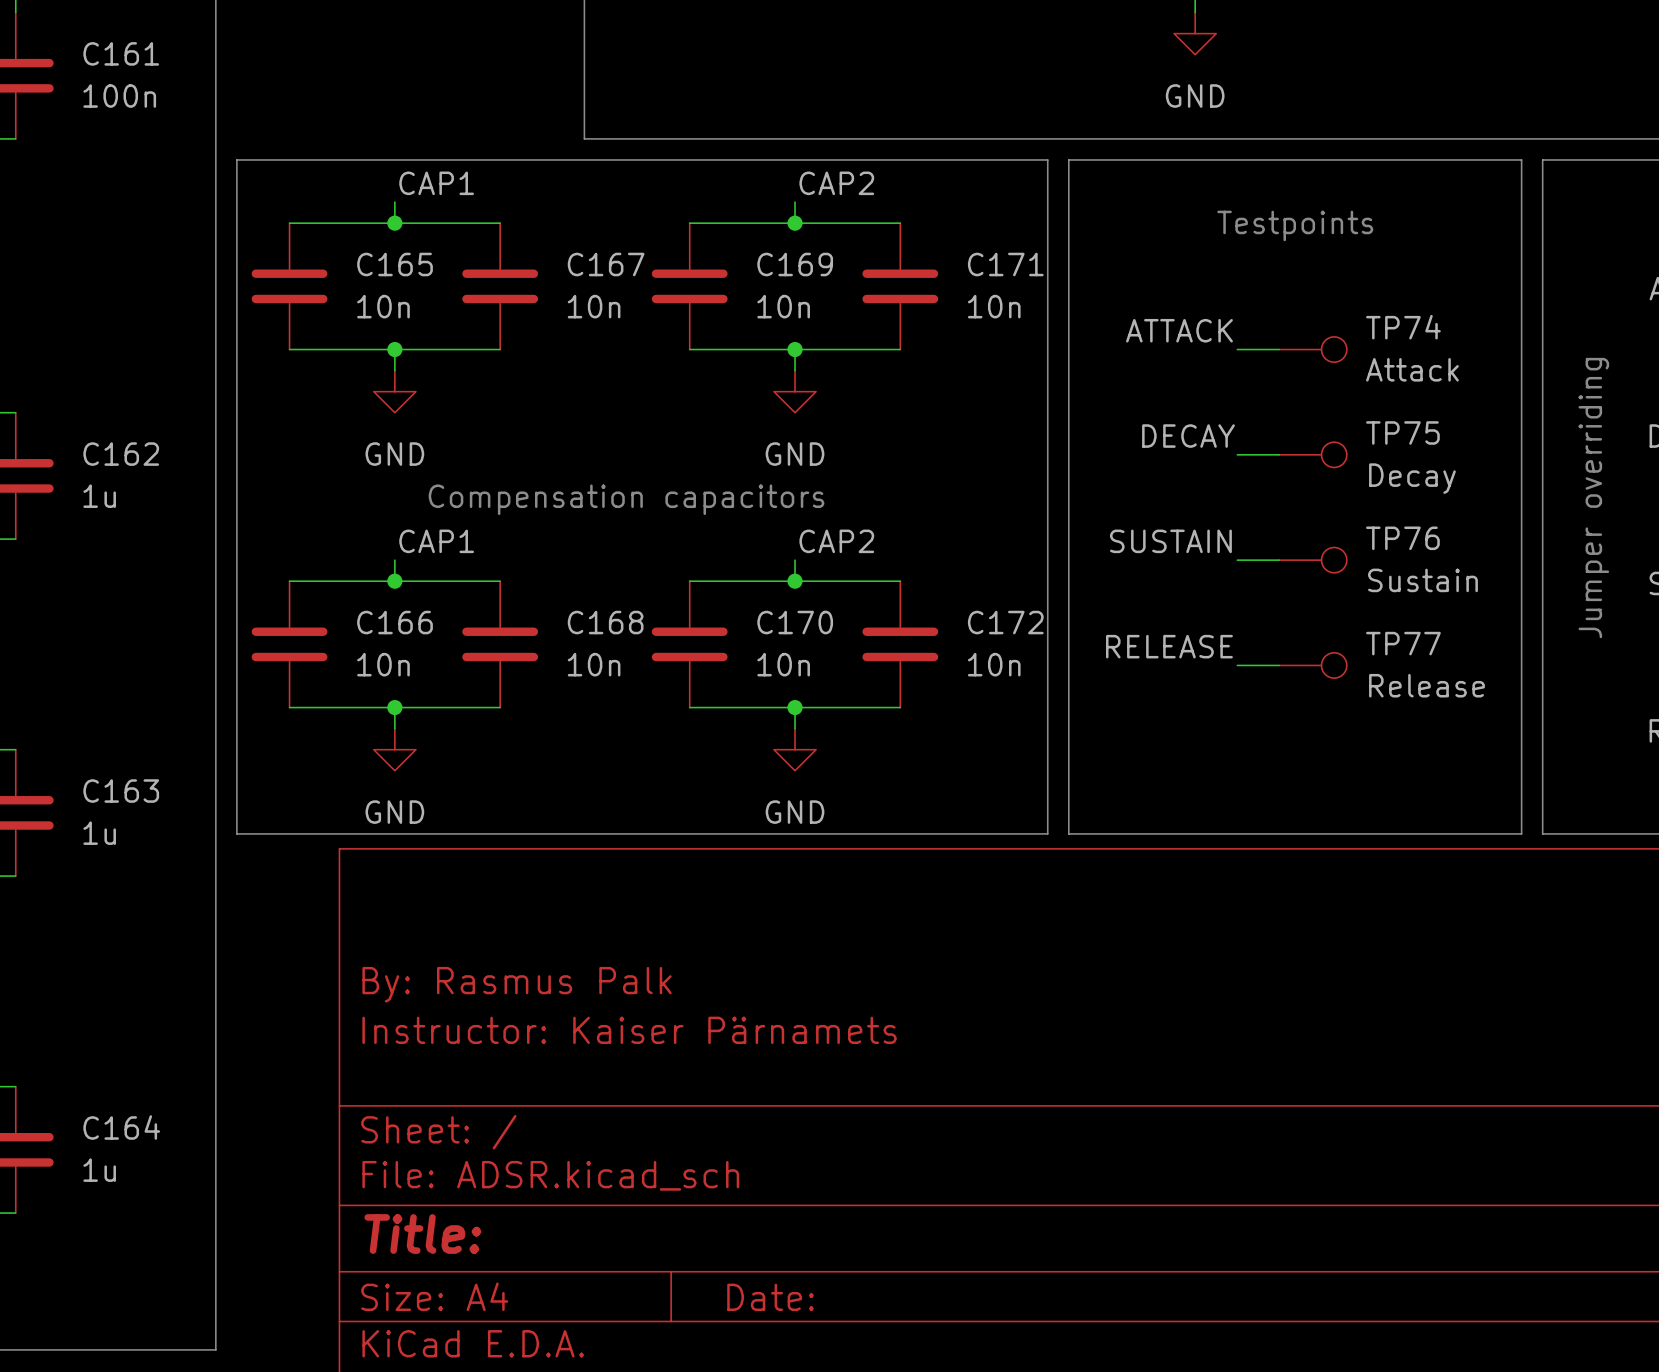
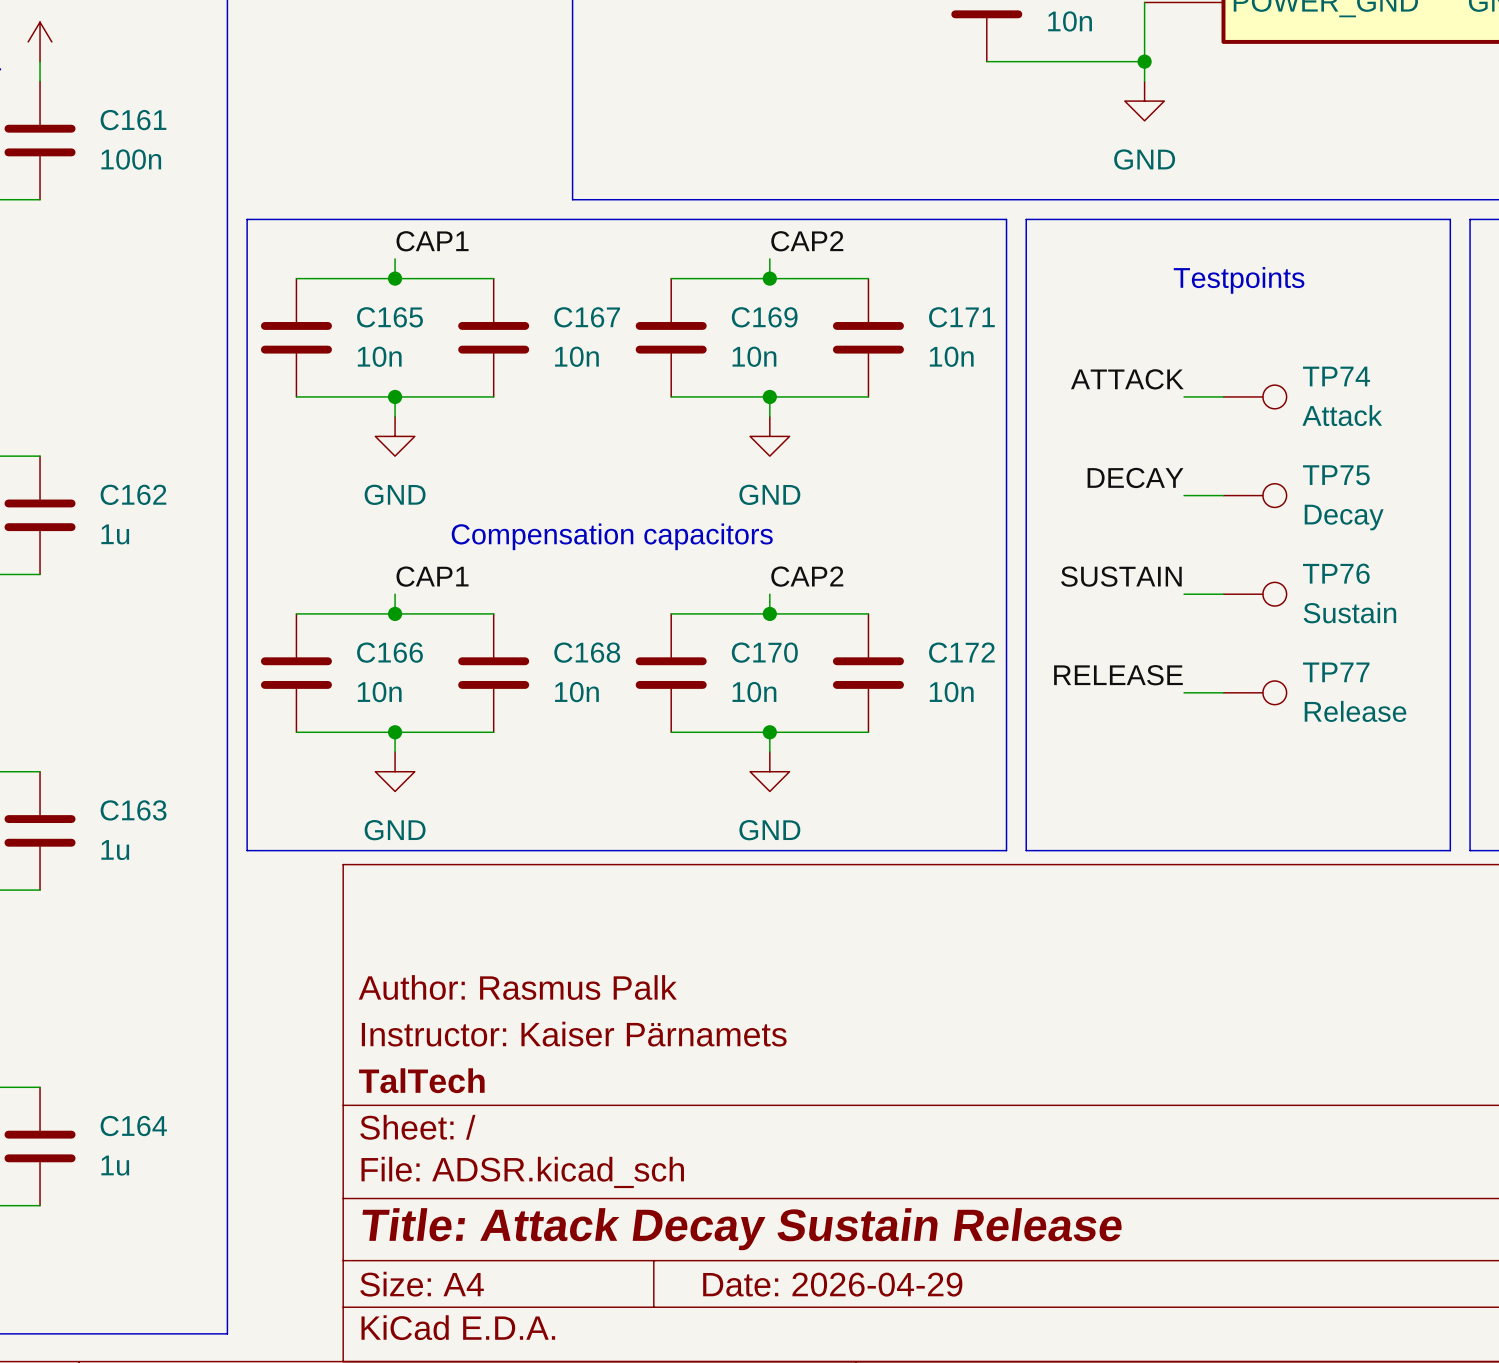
title block: By: Rasmus Palk (517, 984) -> Author: Rasmus Palk (517, 987)
title block: none -> TalTech (421, 1080)
title block: Title: (422, 1234) -> Title: Attack Decay Sustain Release (742, 1229)
title block: Date: (770, 1297) -> Date: 2026-04-29 (832, 1284)

